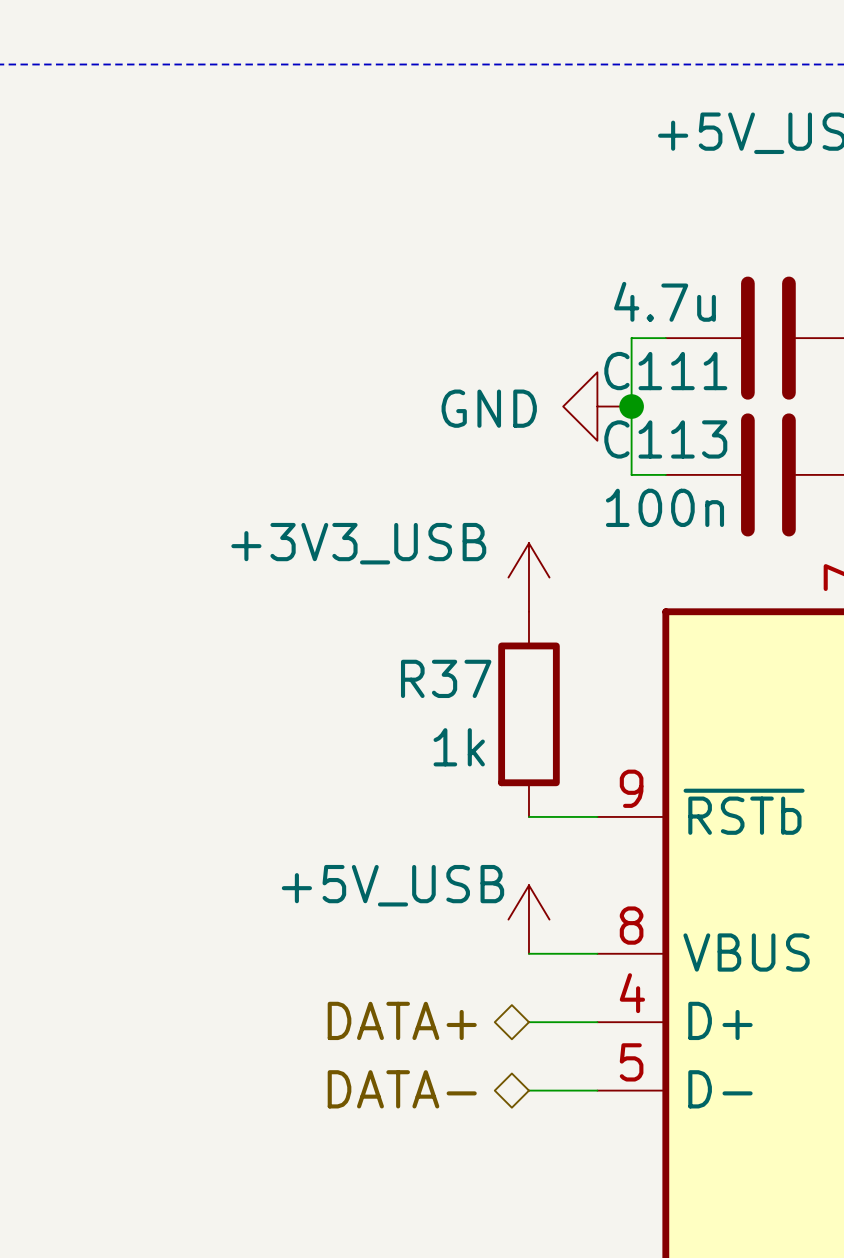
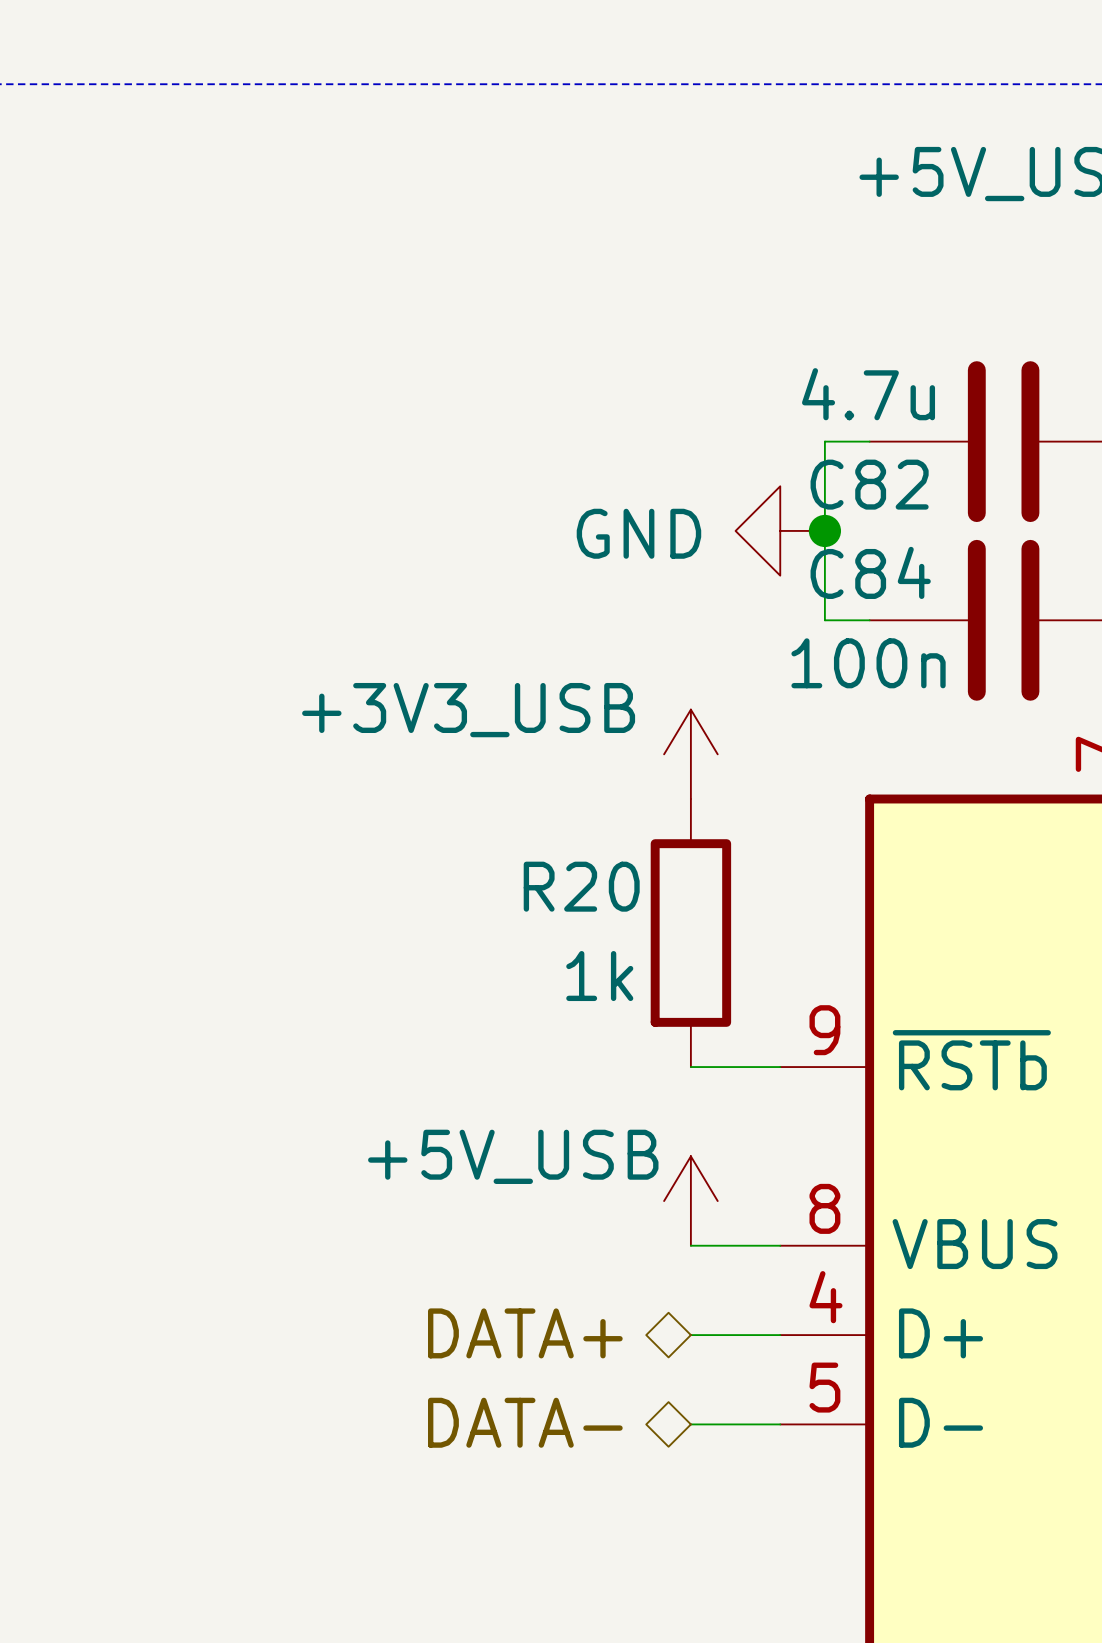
C111 name: C111 (665, 371) -> C82 (869, 484)
C113 name: C113 (665, 439) -> C84 (870, 572)
R37 name: R37 (446, 678) -> R20 (581, 886)

